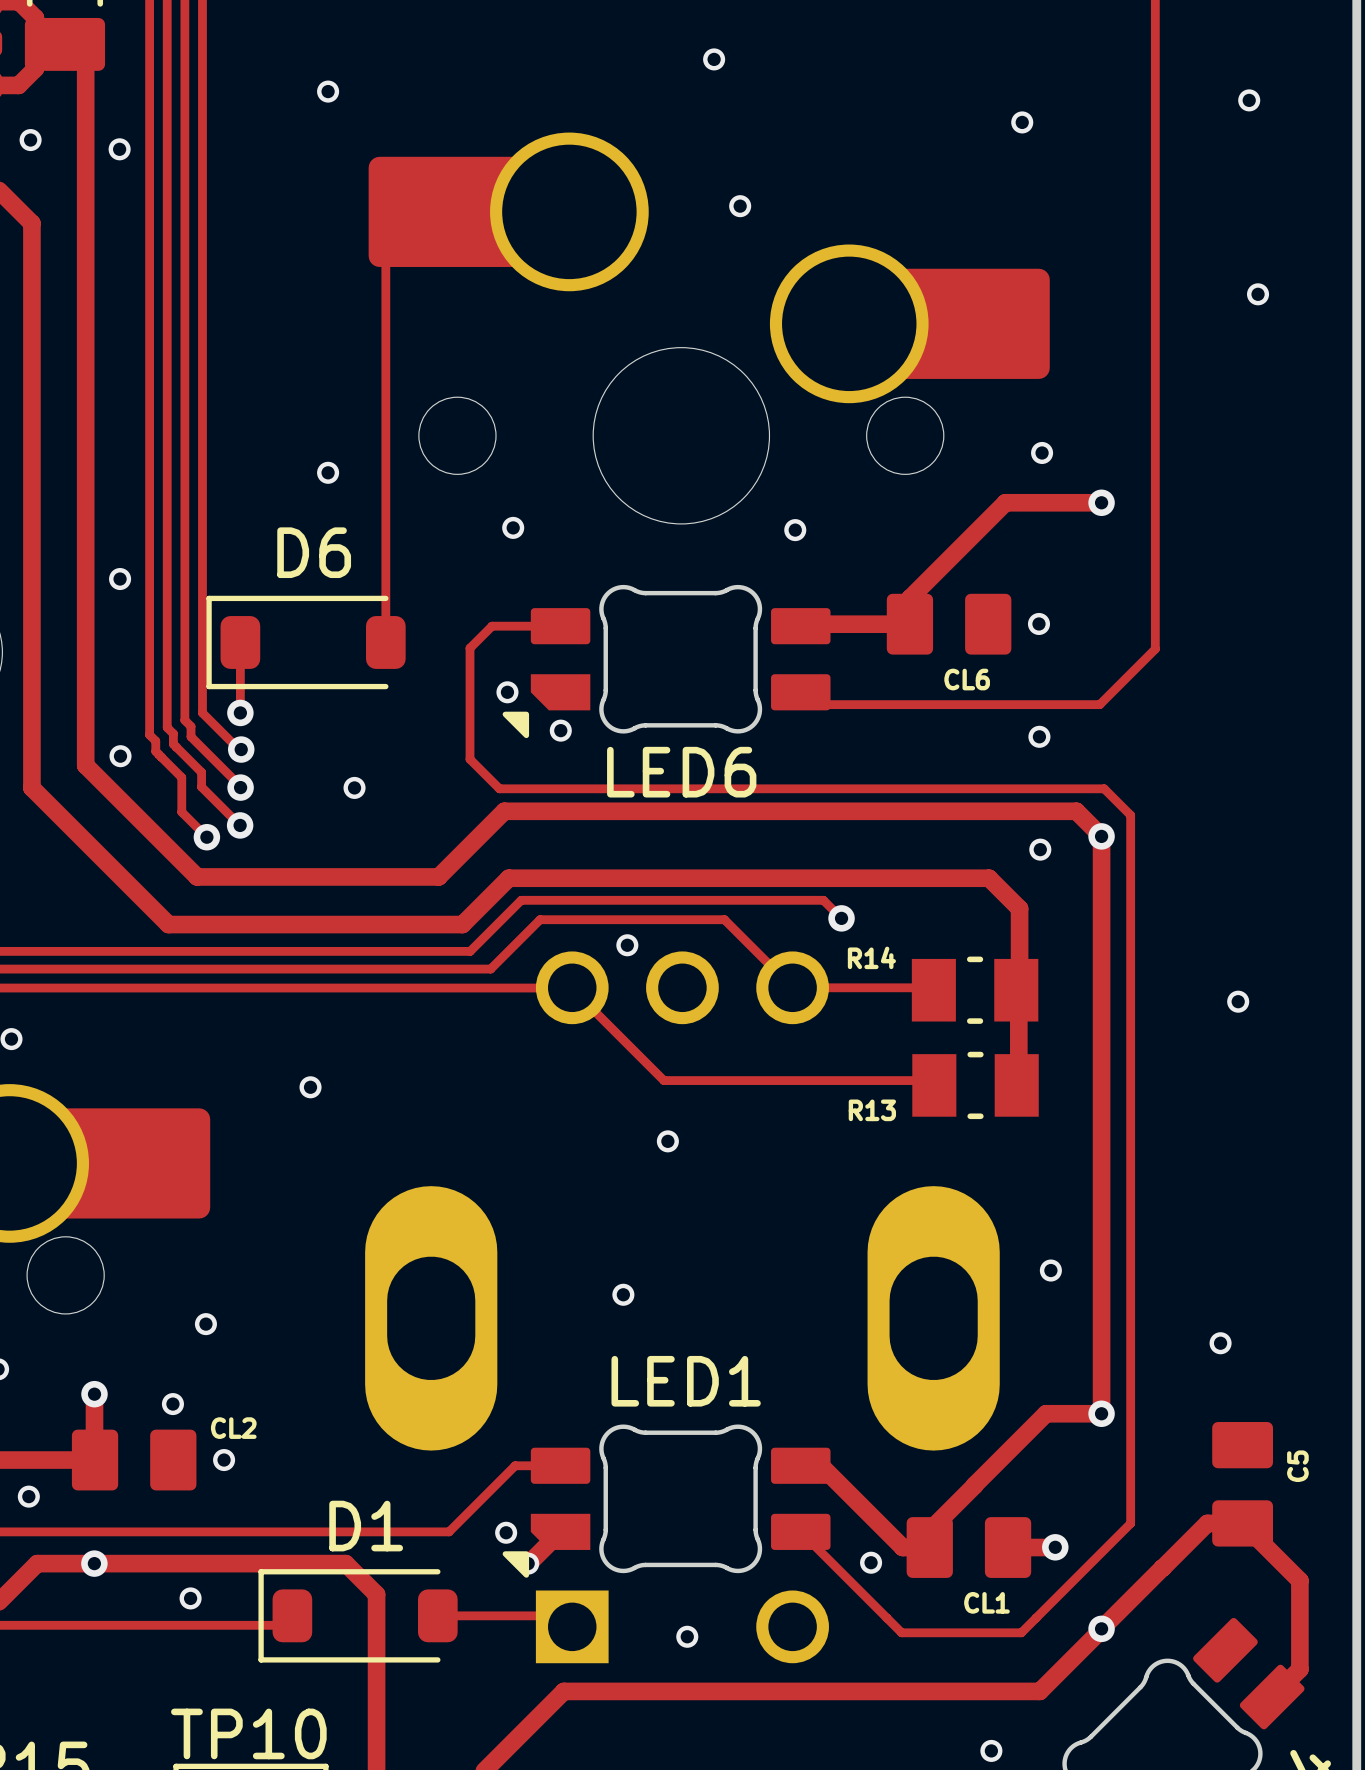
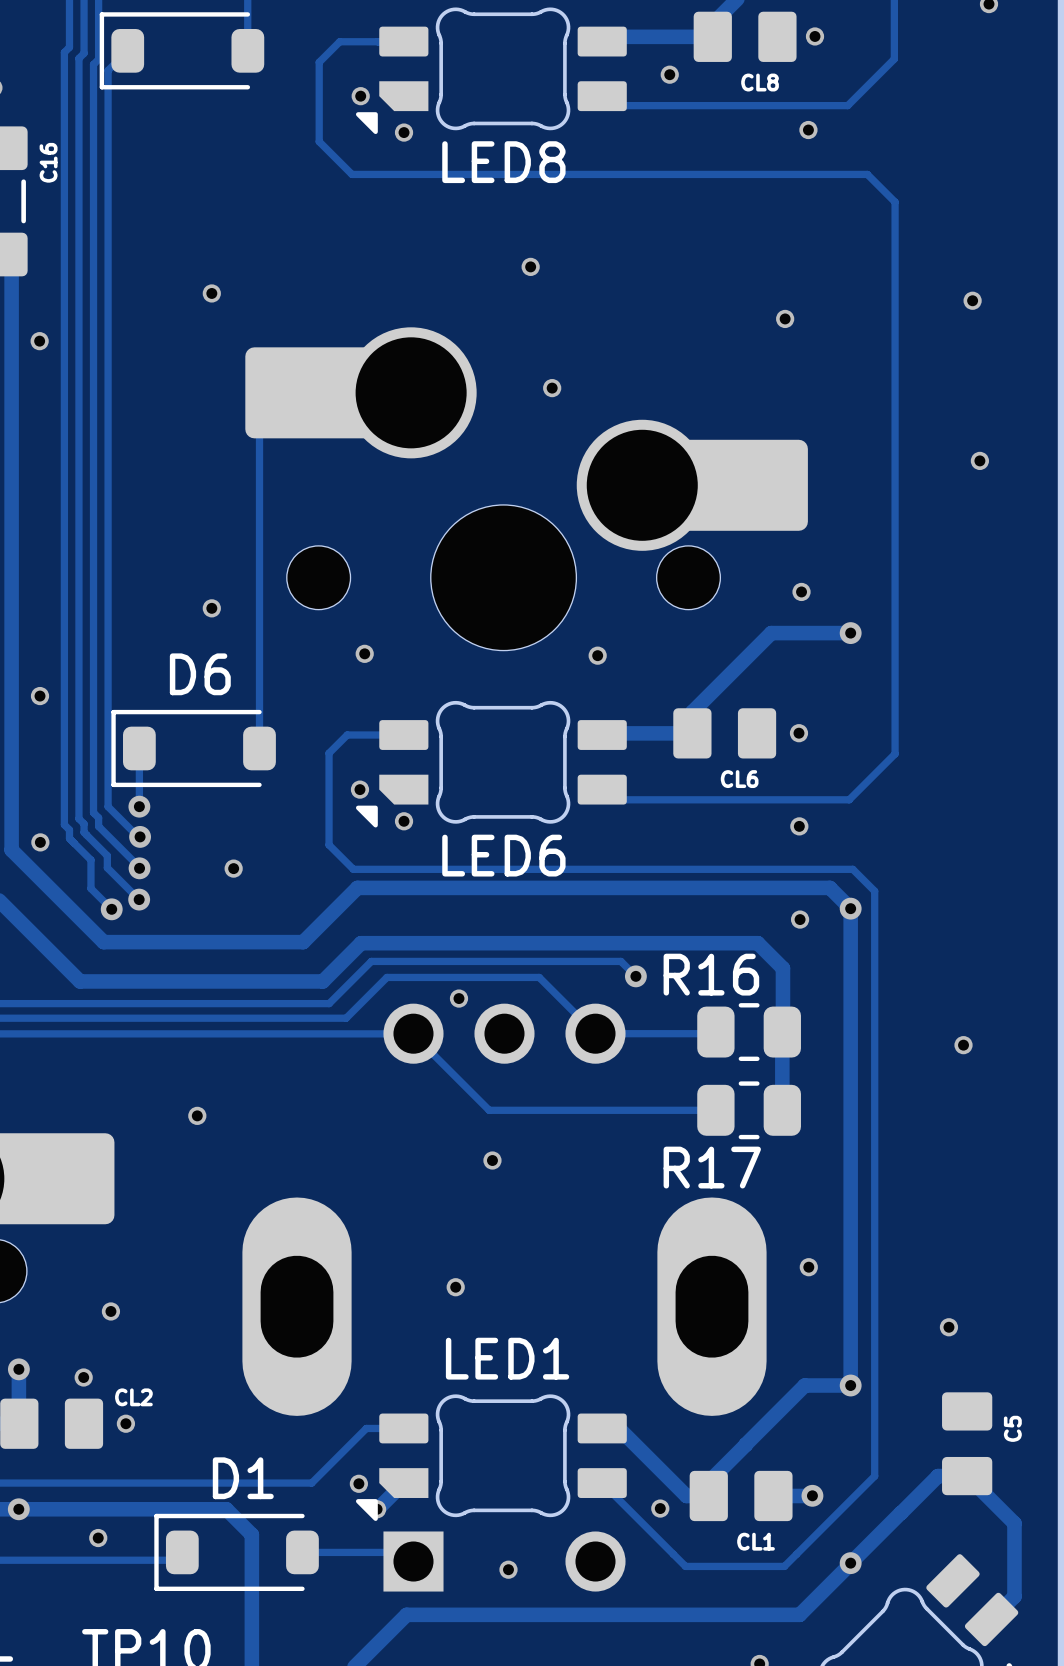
R16: none -> (749, 1032)
R14: (975, 990) -> none
R17: none -> (749, 1110)
R13: (975, 1085) -> none

